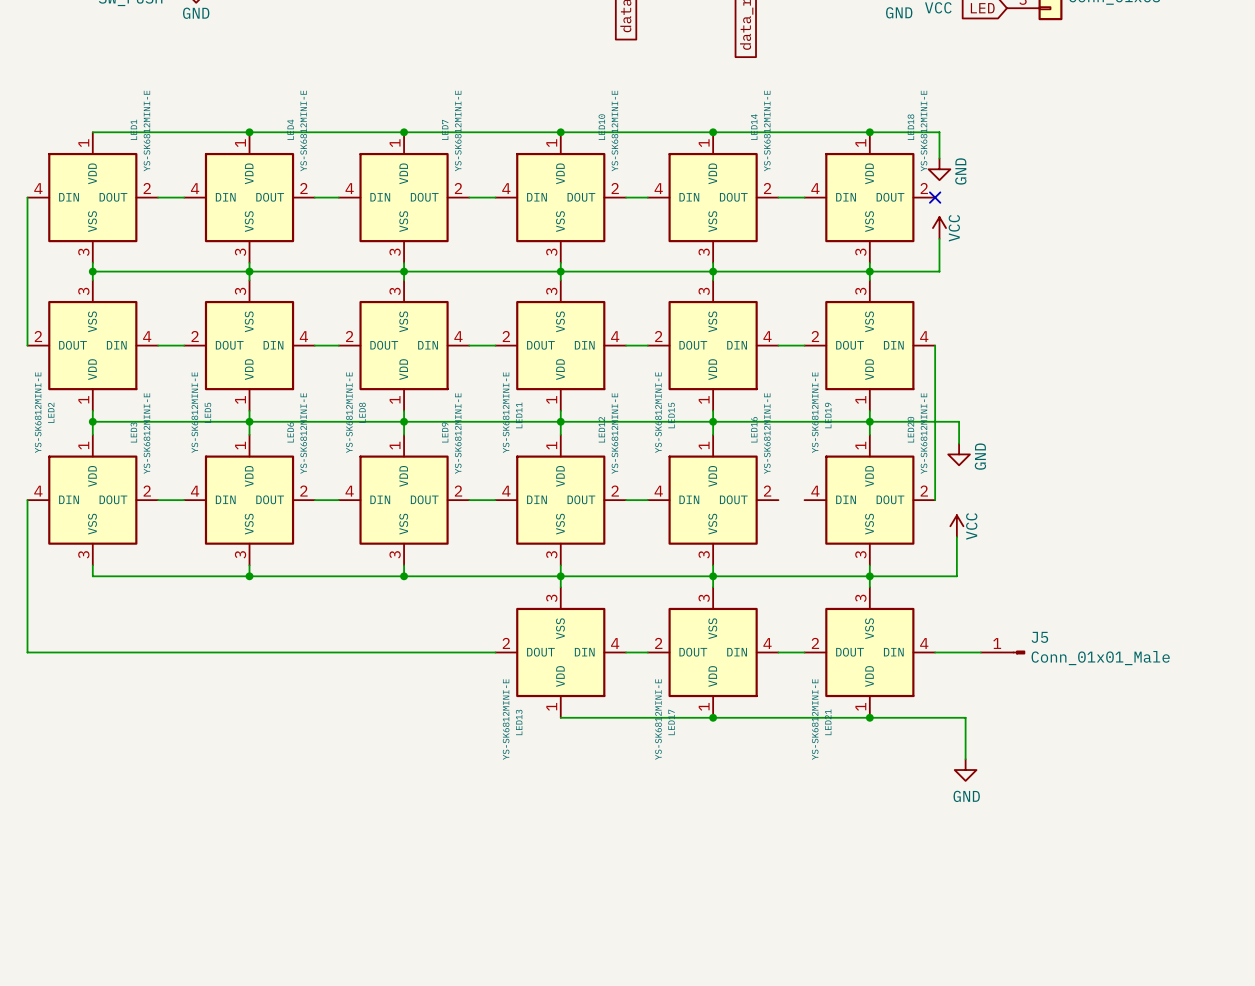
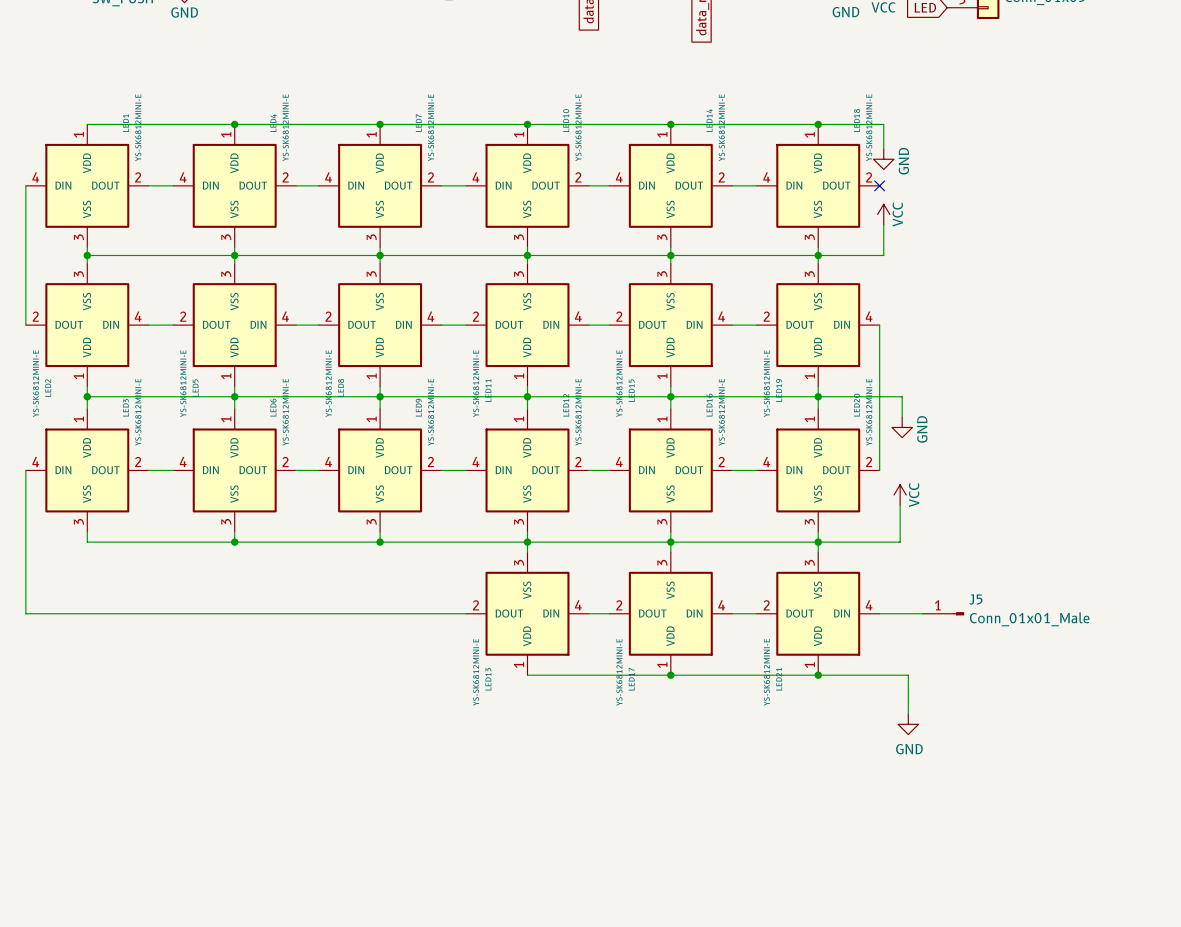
wire: none -> (732, 470) (756, 470)

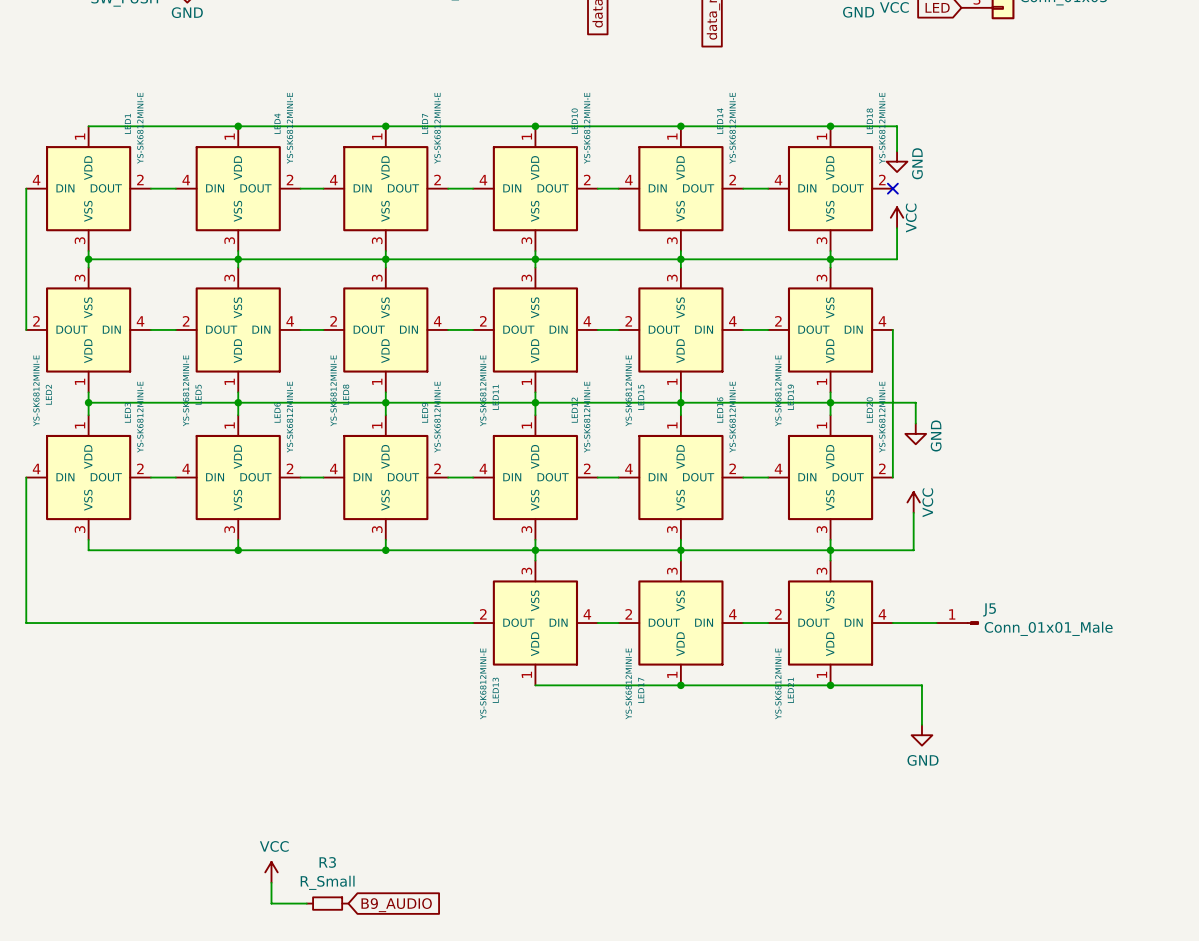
power symbol: none -> VCC (271, 872)
wire: none -> (271, 882) (271, 903) (306, 903)
R3: none -> R_Small (327, 903)
global label: none -> B9_AUDIO (396, 905)

